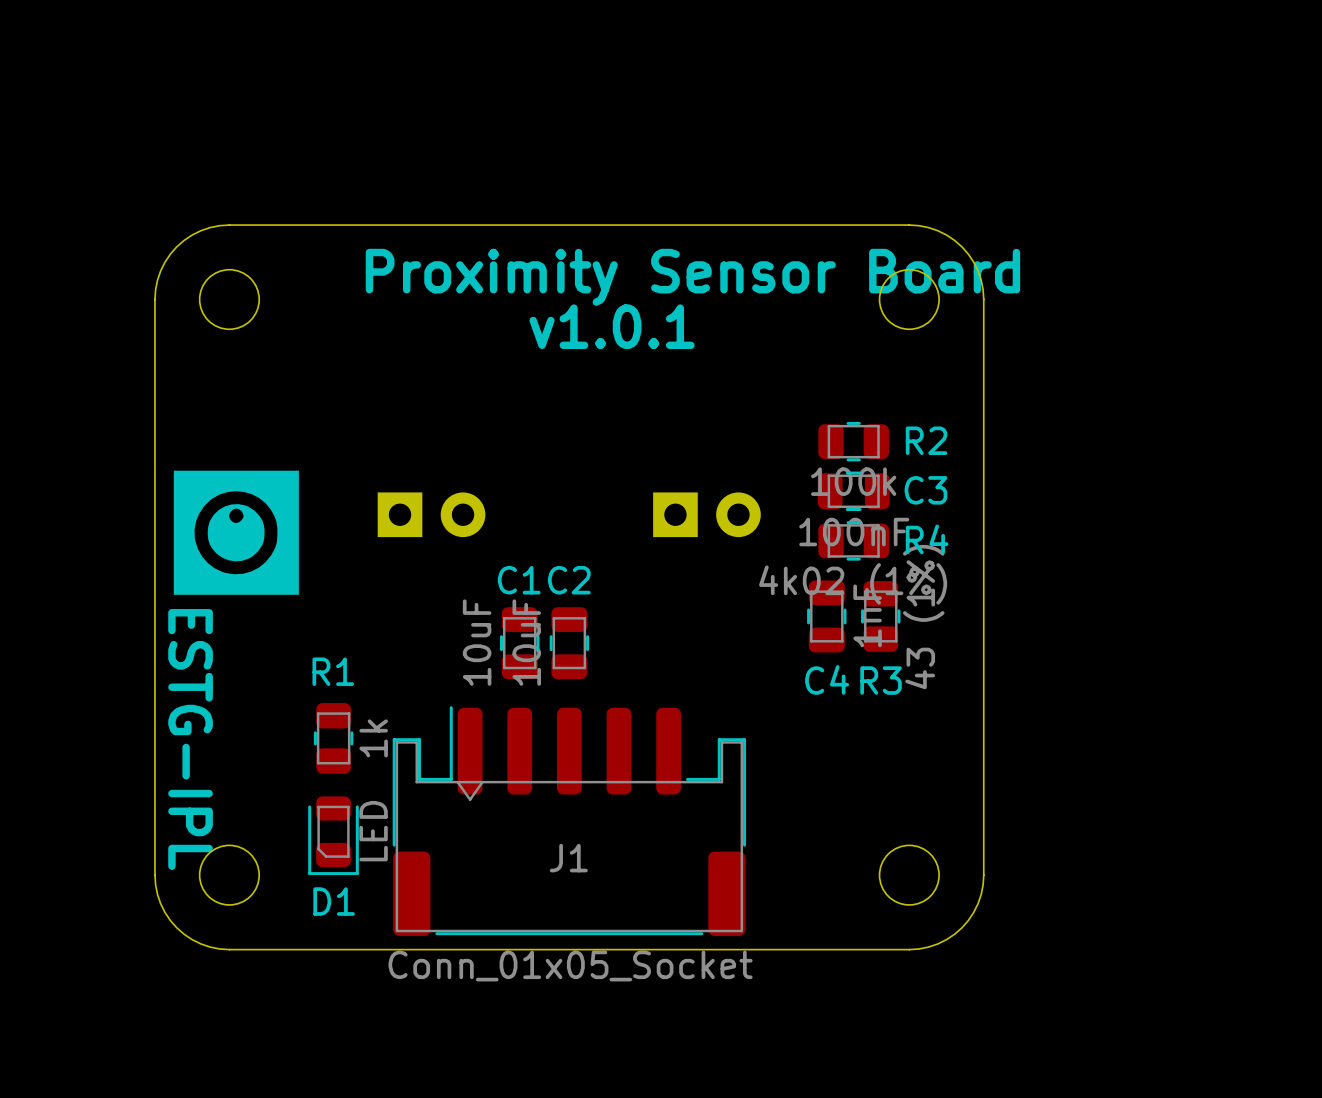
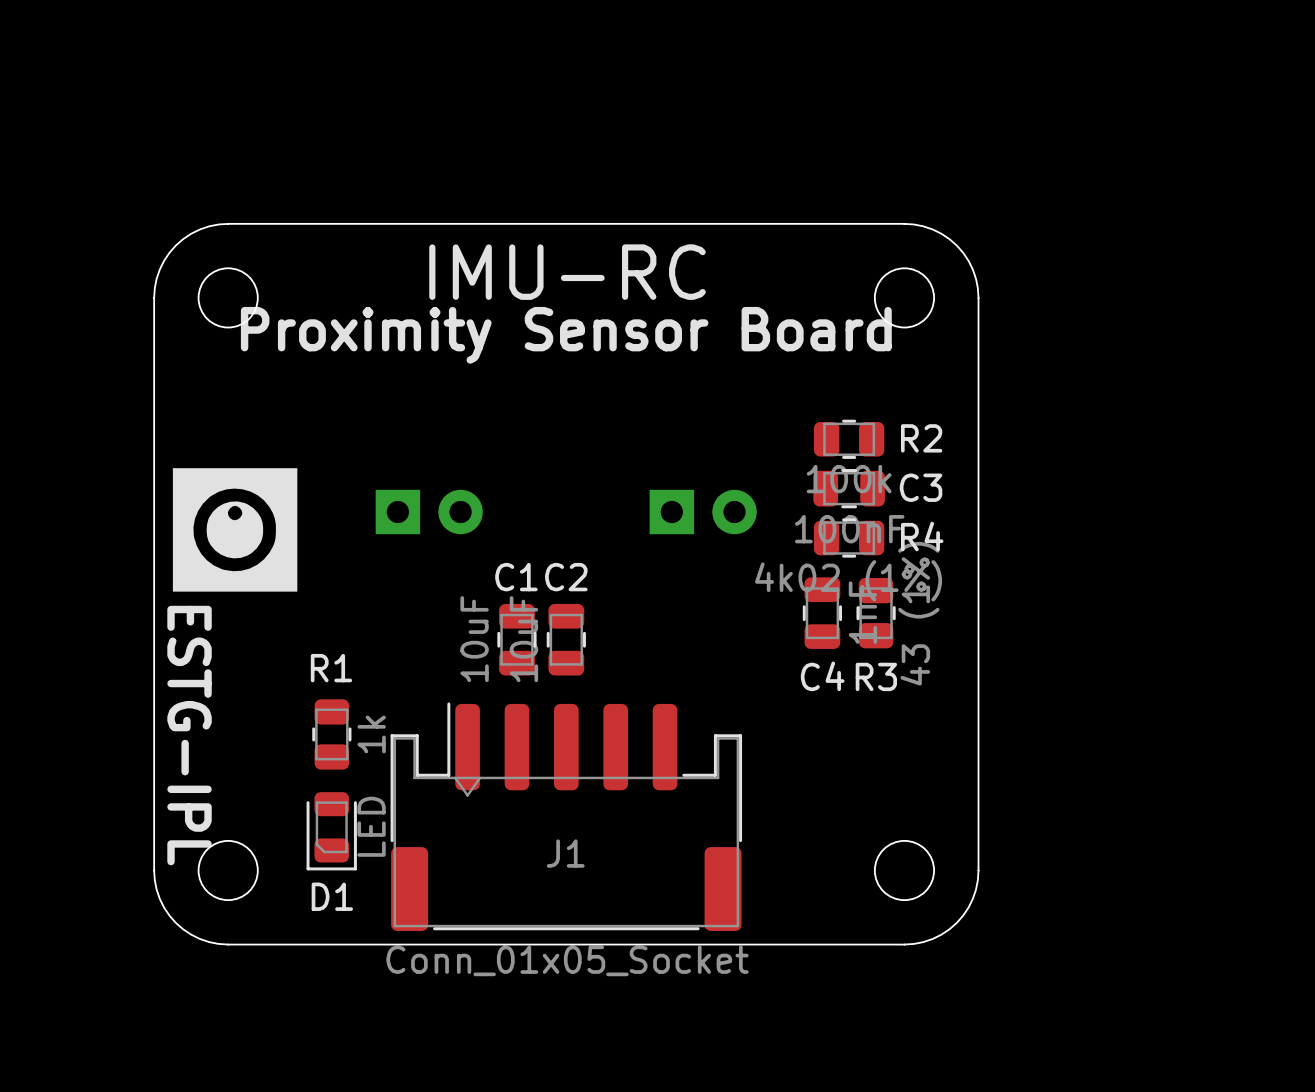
text: none -> IMU-RC (567, 272)
text position: Proximity Sensor Board (692, 277) -> Proximity Sensor Board (566, 335)
text: v1.0.1 (612, 326) -> none

